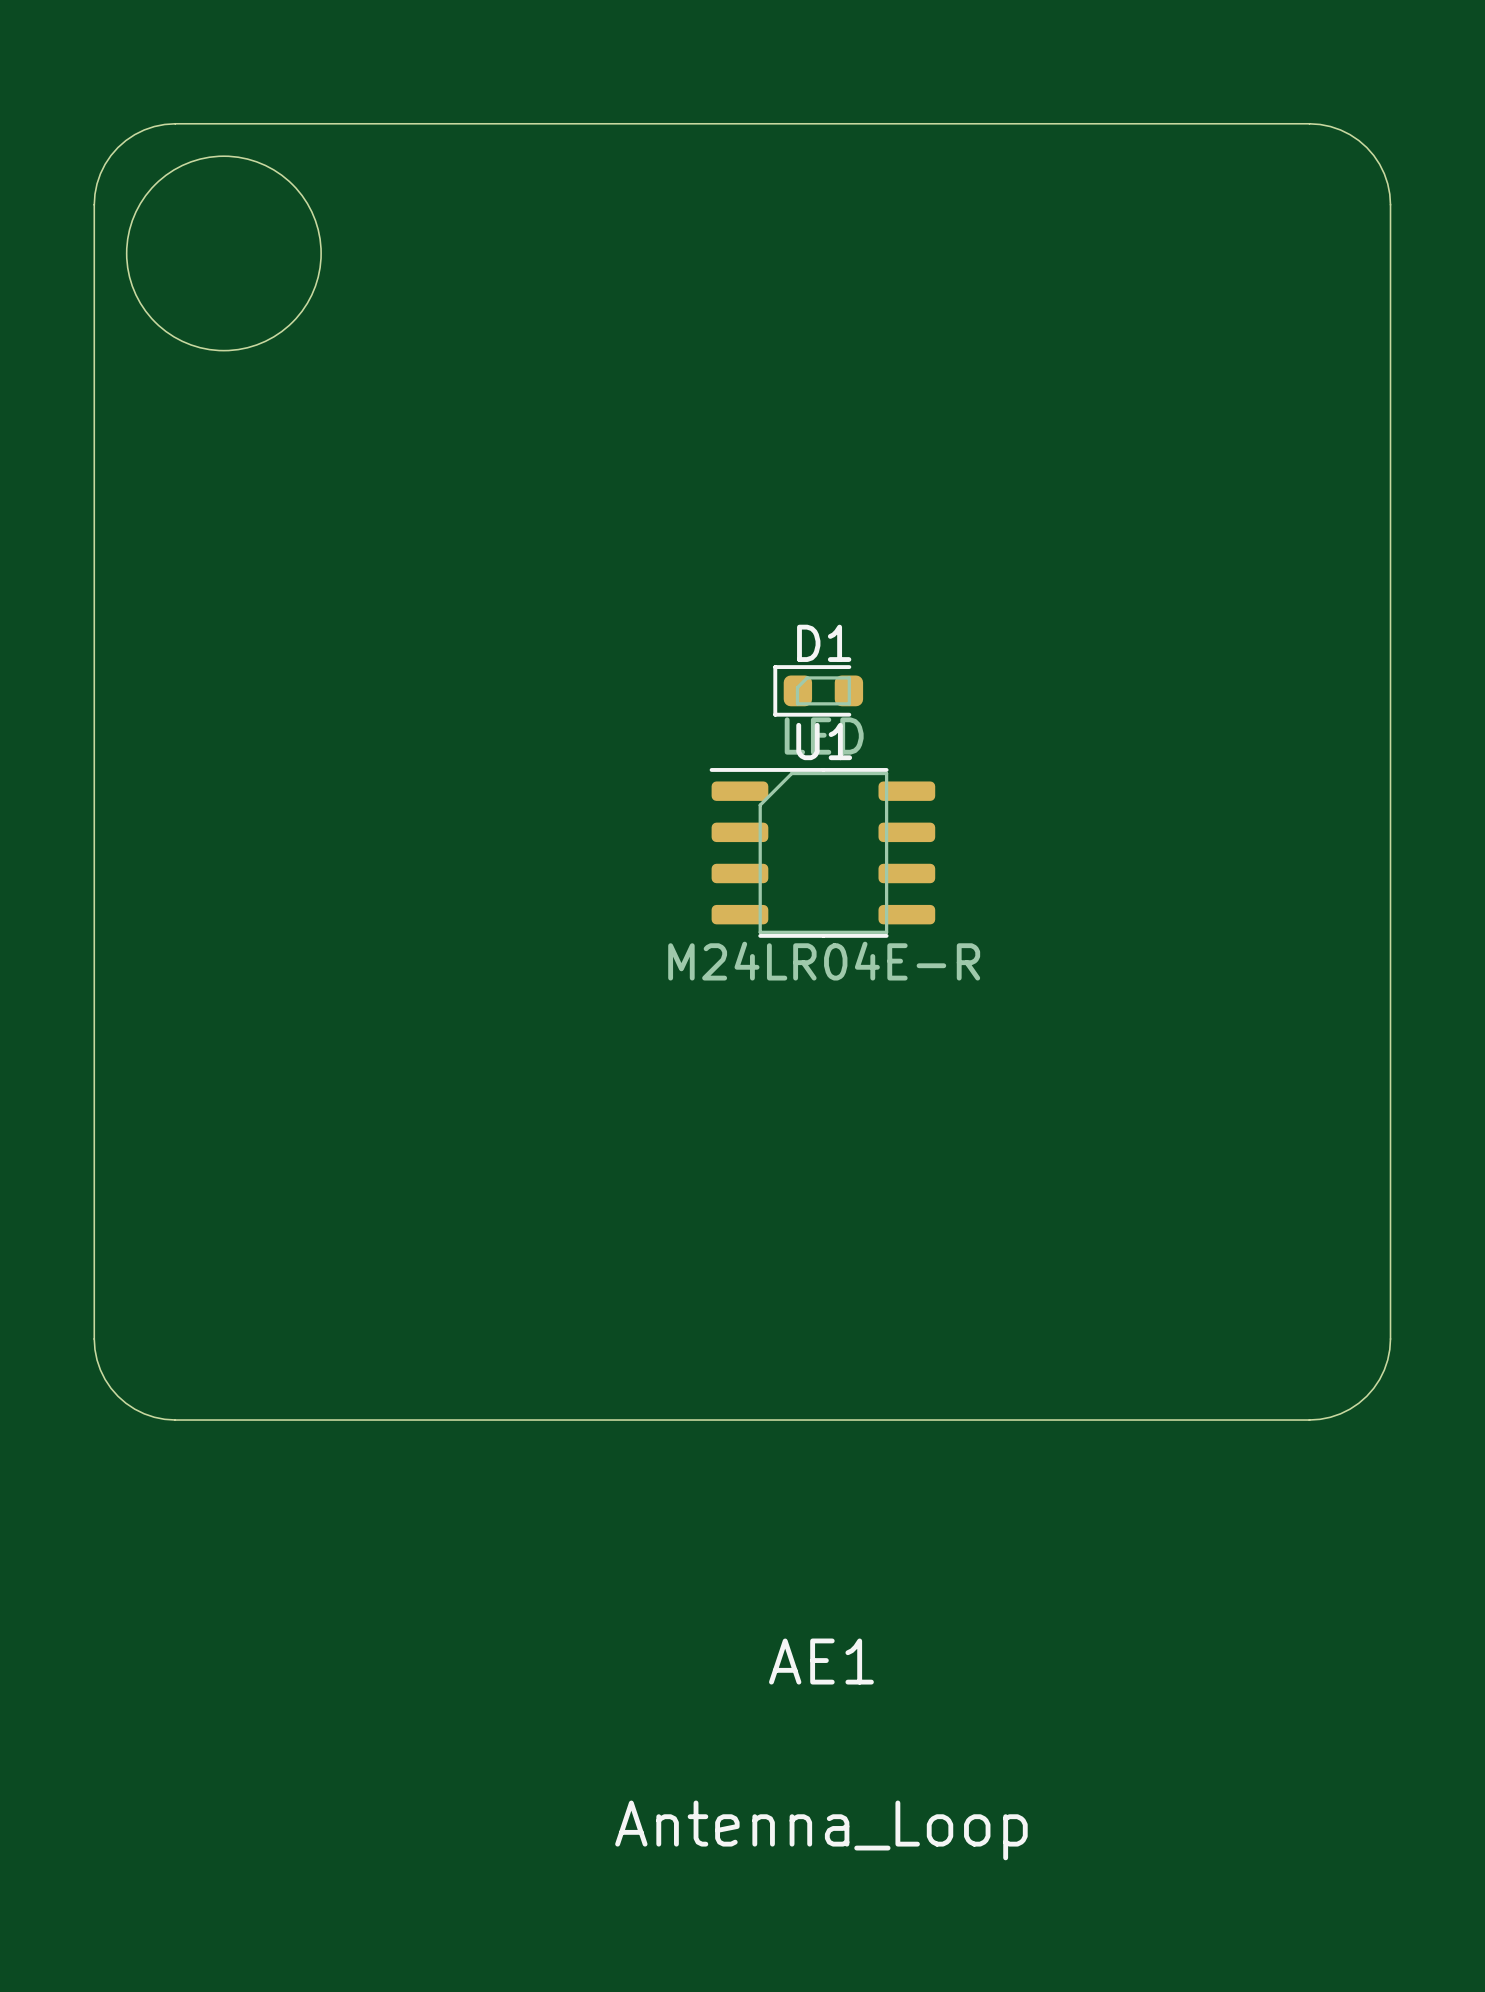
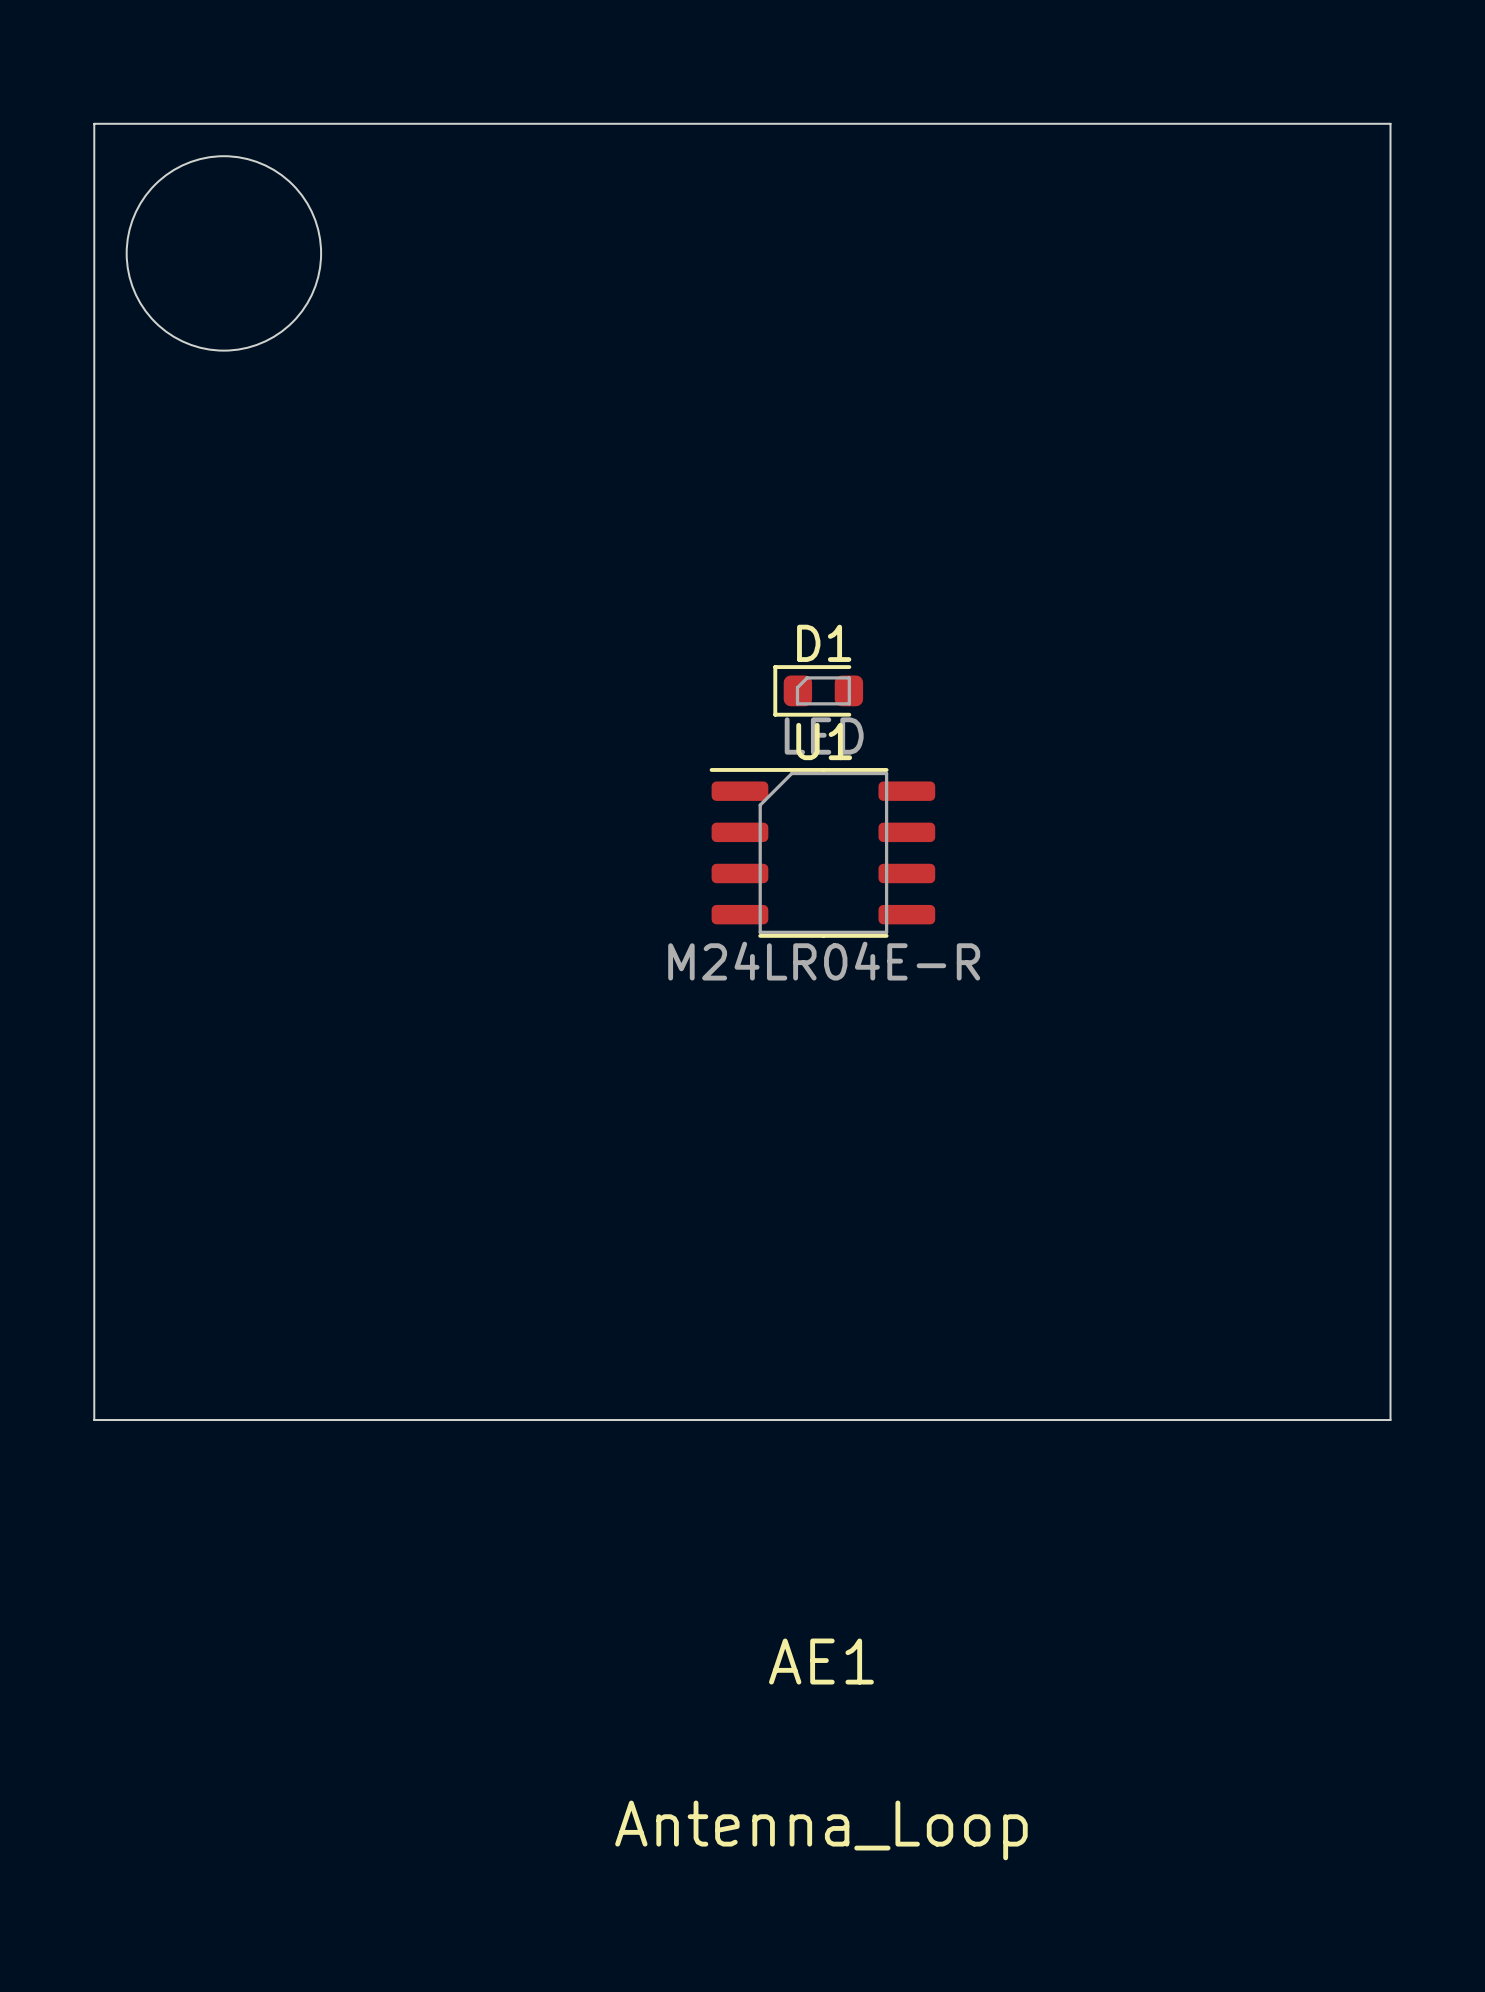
board edge: (175, 123) (144, 129) (118, 147) (100, 173) (94, 204) -> (175, 123) (94, 123) (94, 204)
board edge: (1309, 123) (1340, 129) (1366, 147) (1384, 173) (1390, 204) -> (1309, 123) (1390, 123) (1390, 204)
board edge: (94, 1339) (100, 1370) (118, 1396) (144, 1413) (175, 1420) -> (94, 1339) (94, 1420) (175, 1420)
board edge: (1390, 1339) (1384, 1370) (1366, 1396) (1340, 1413) (1309, 1420) -> (1390, 1339) (1390, 1420) (1309, 1420)

